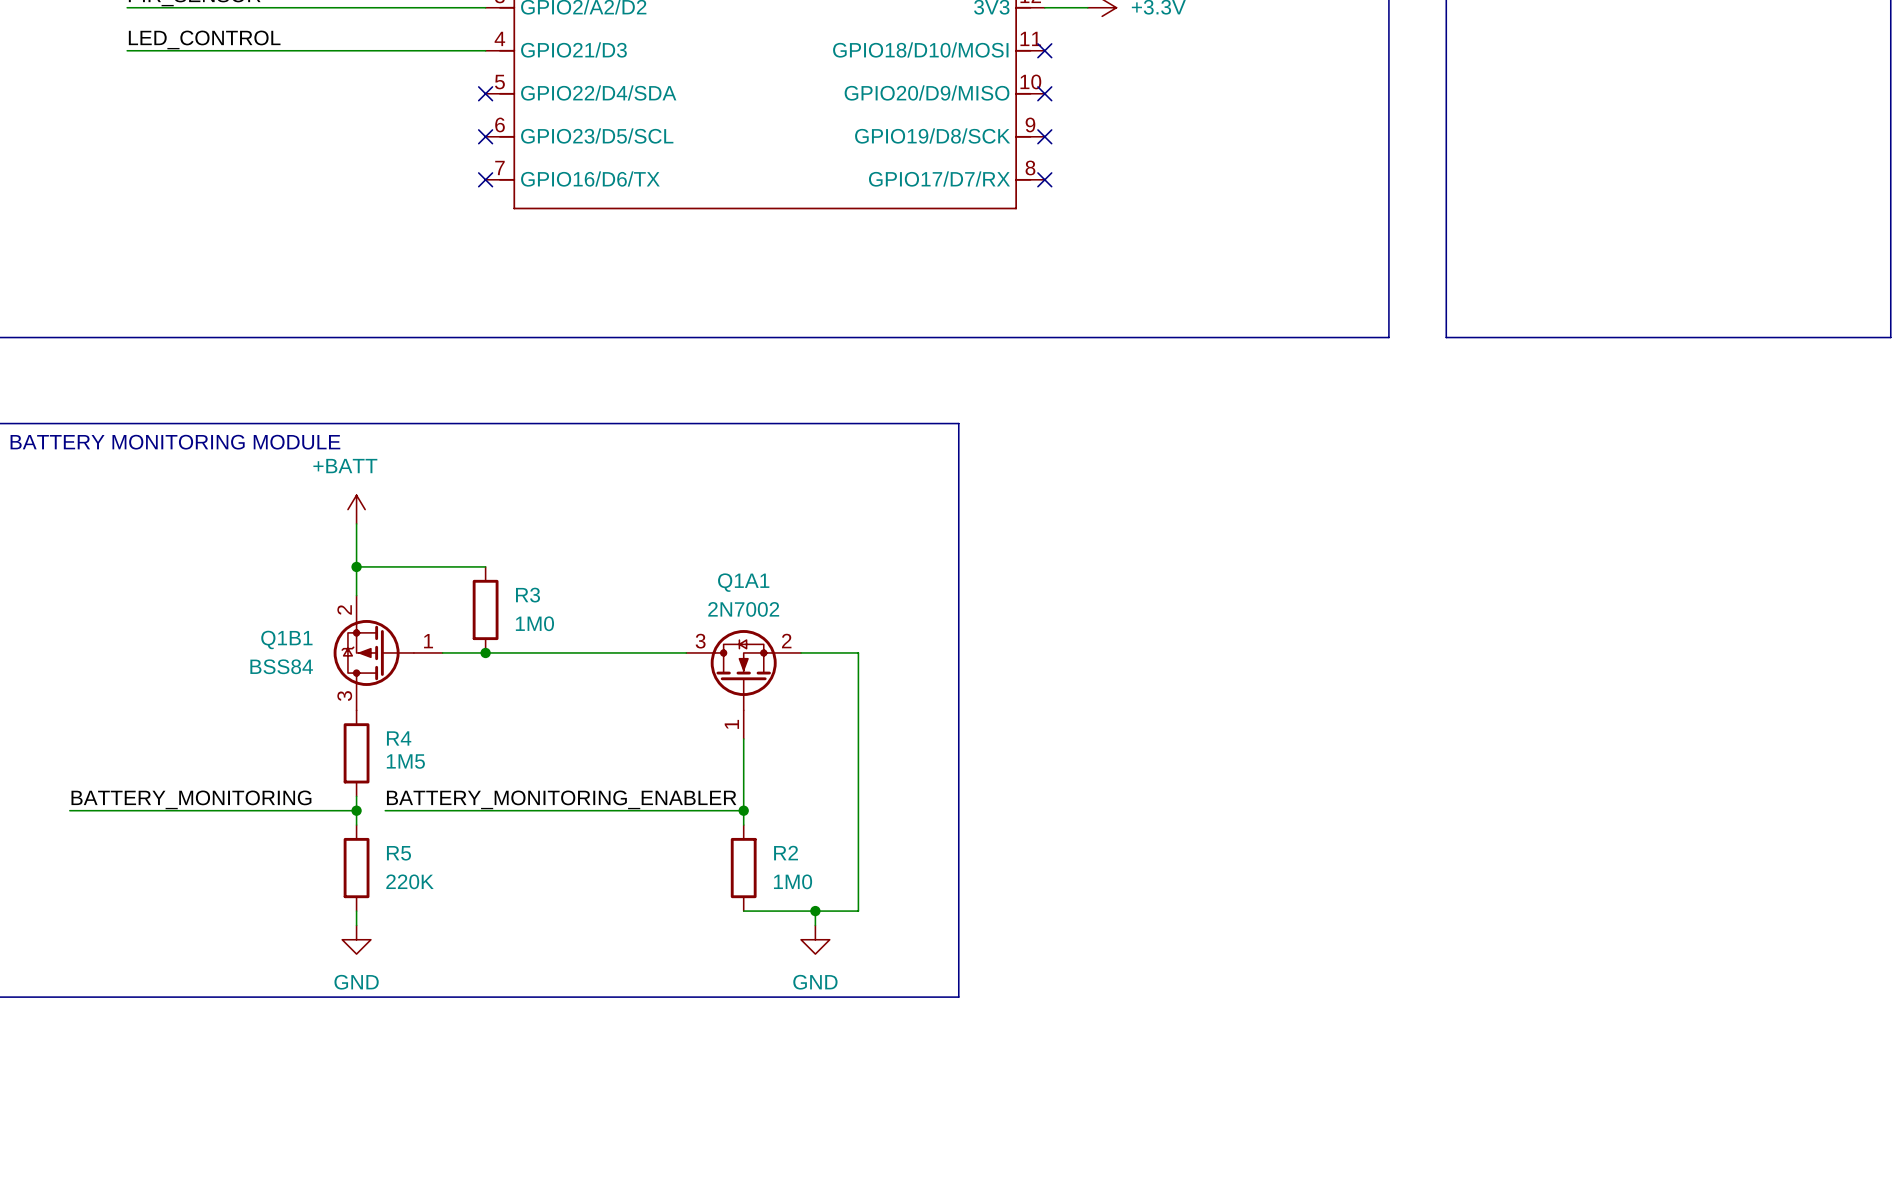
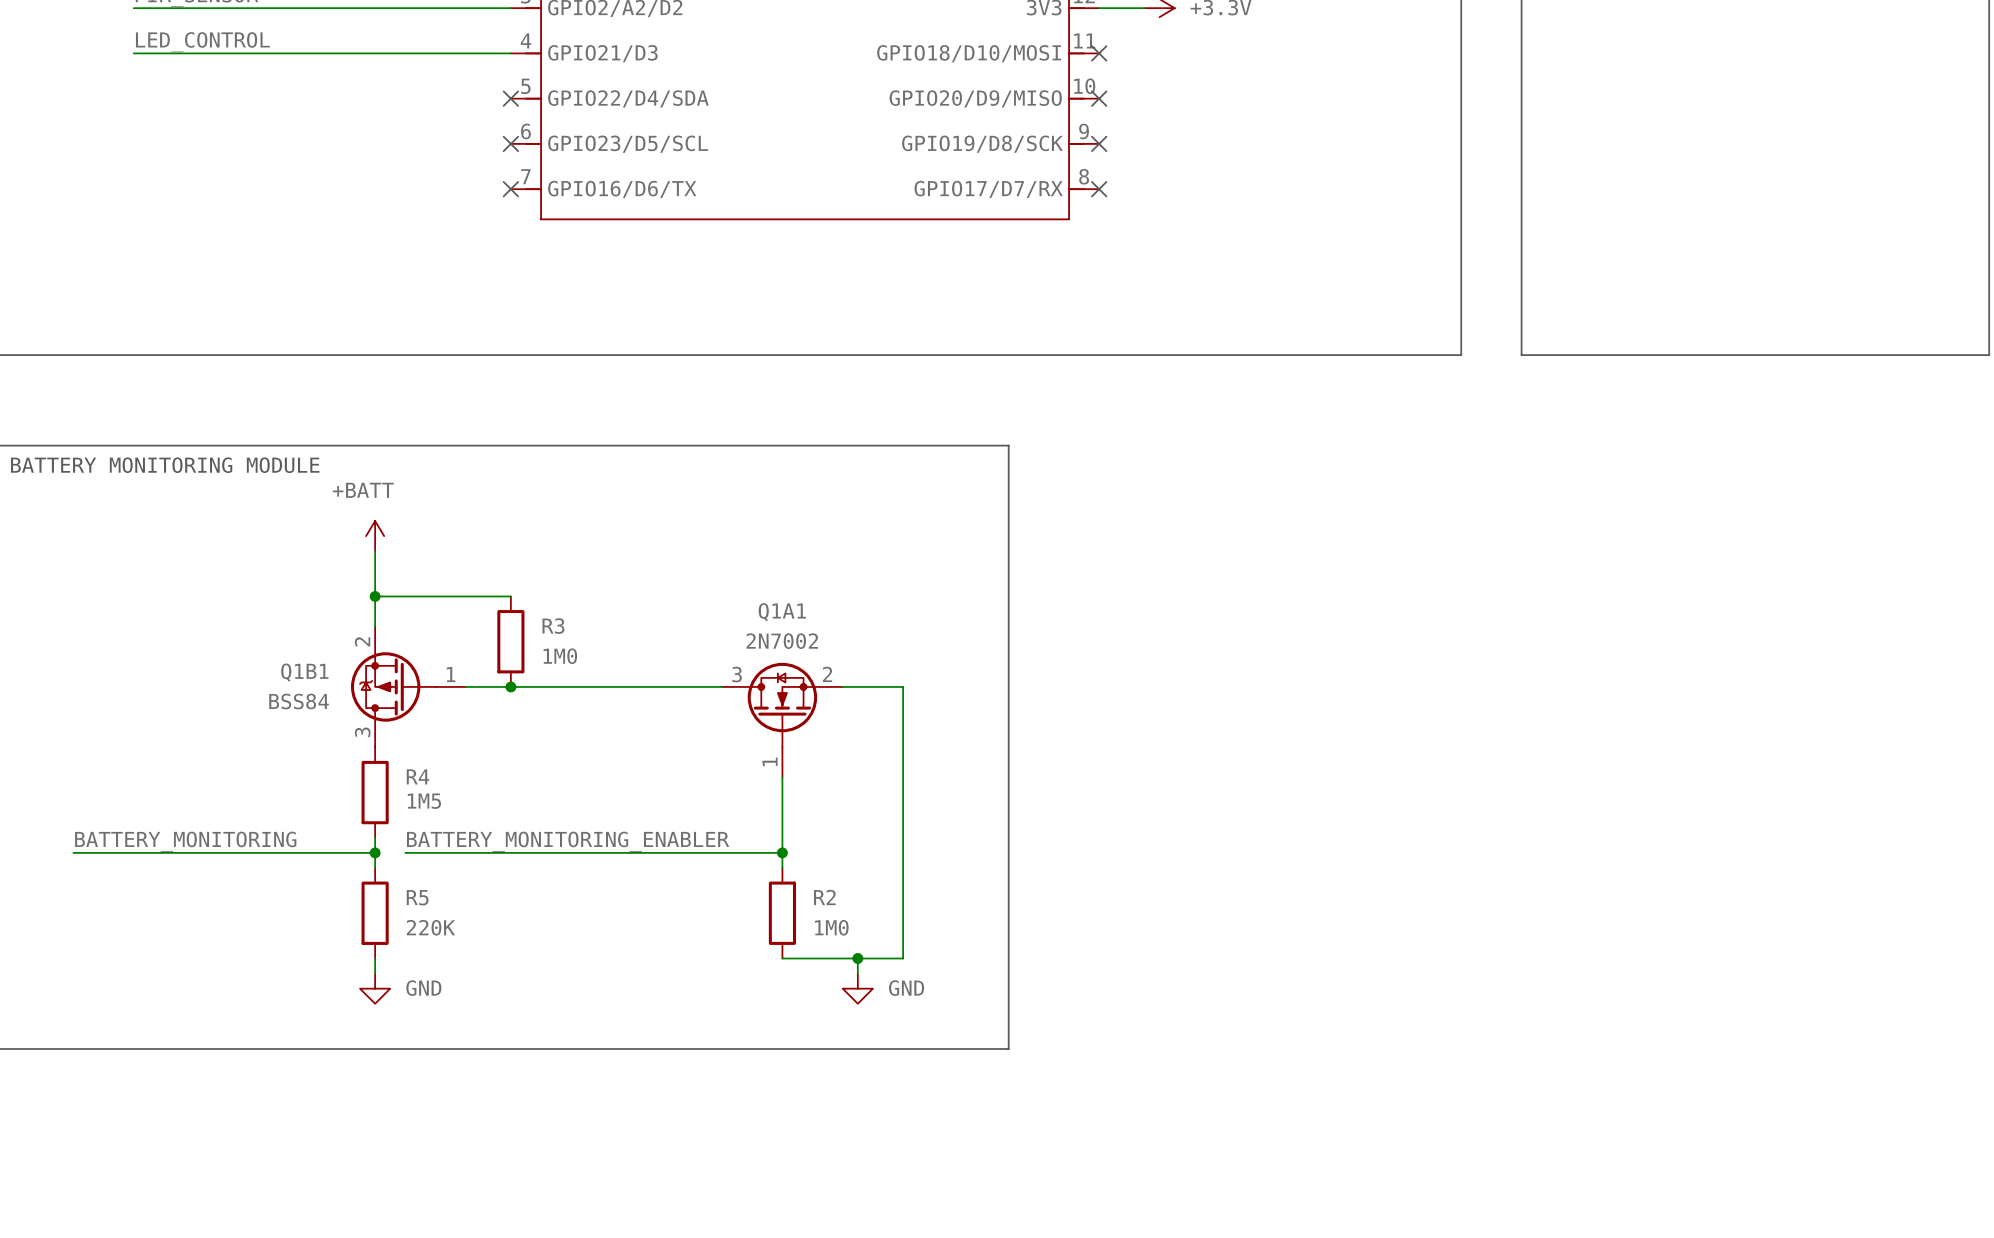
power symbol text position: GND (356, 982) -> GND (423, 988)
power symbol text position: GND (815, 982) -> GND (906, 988)

